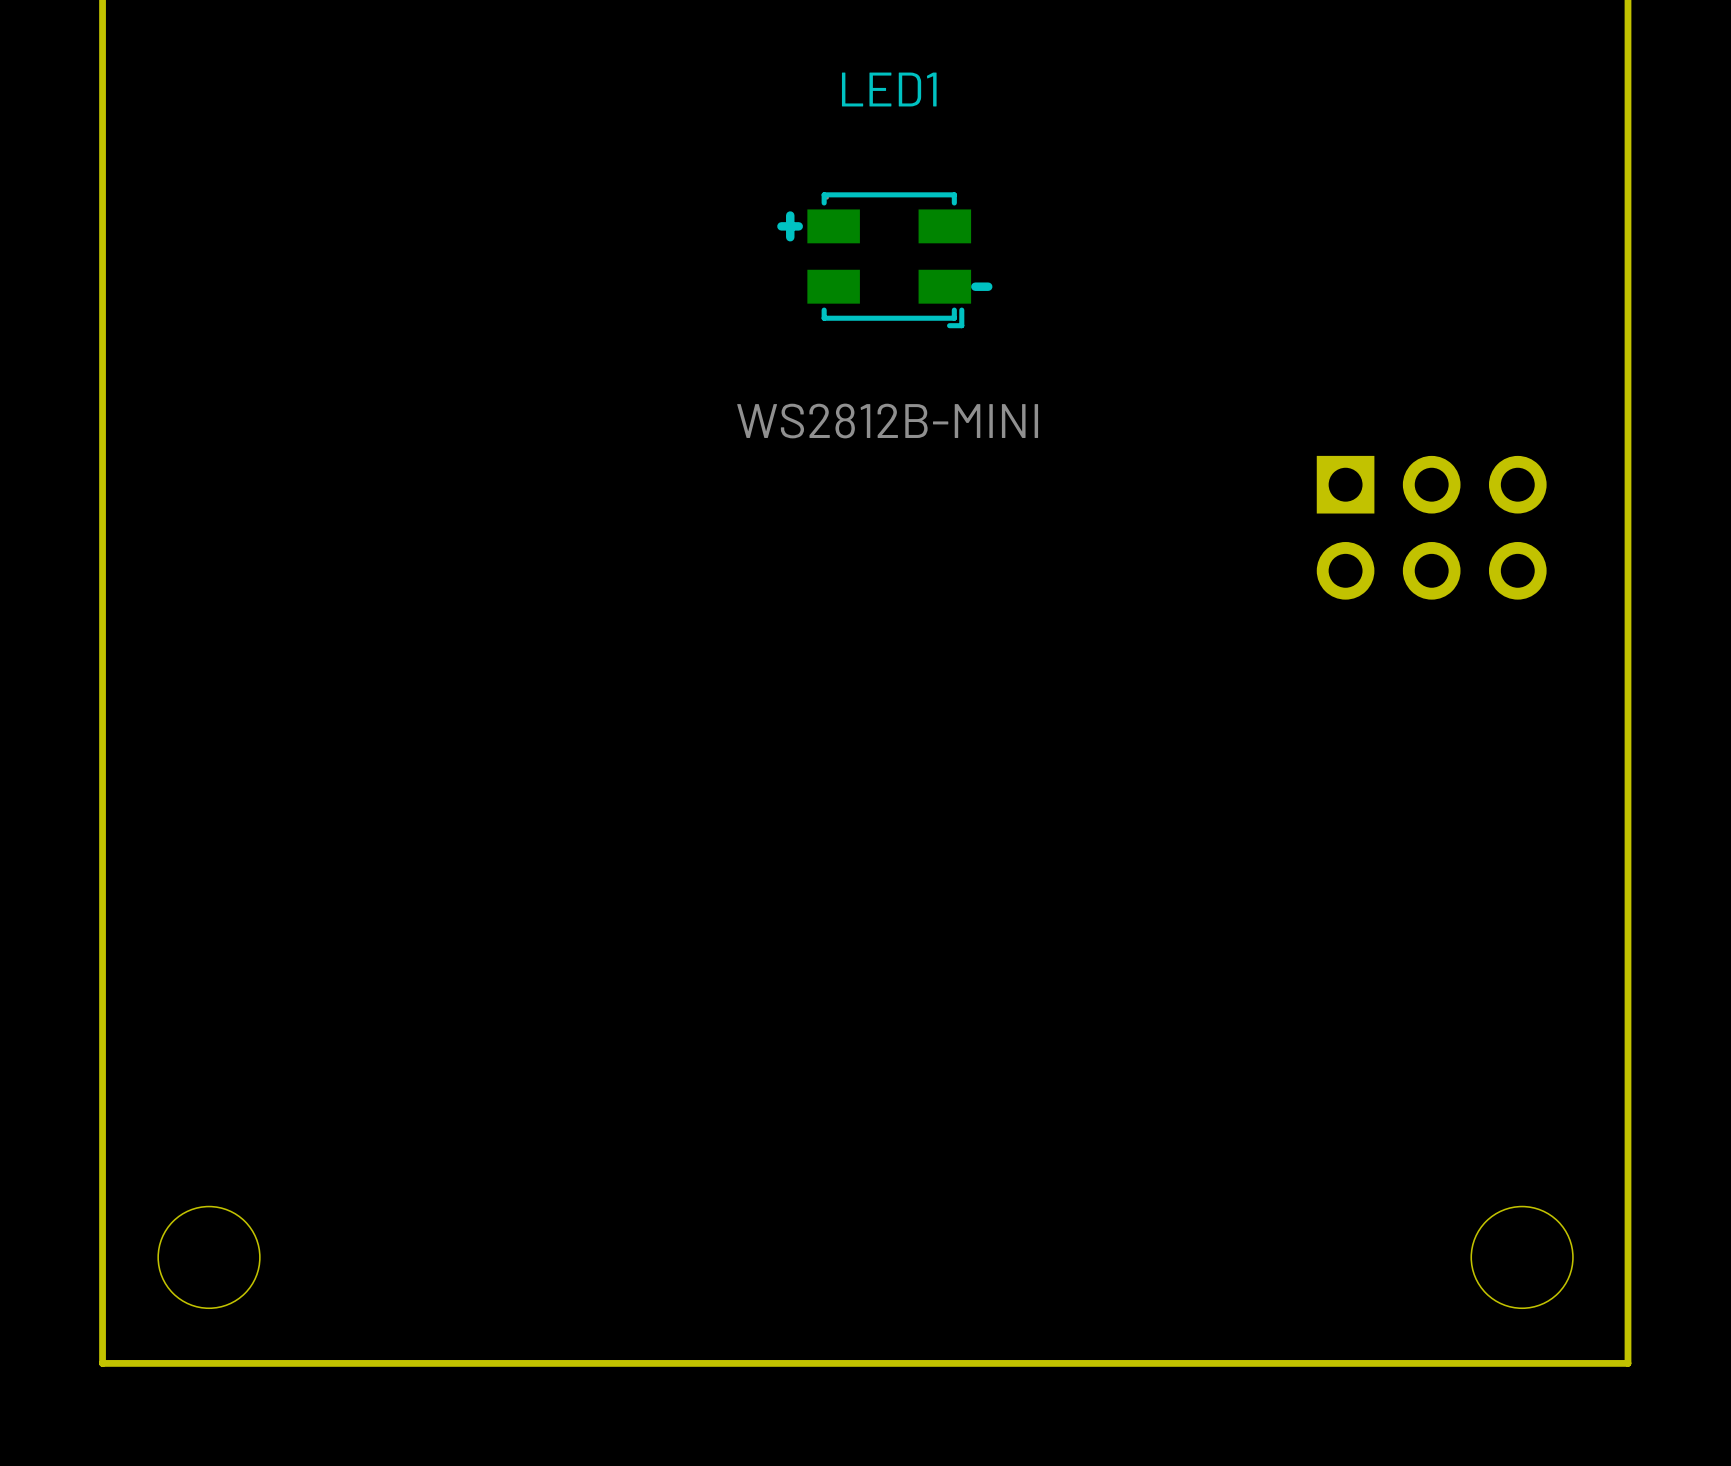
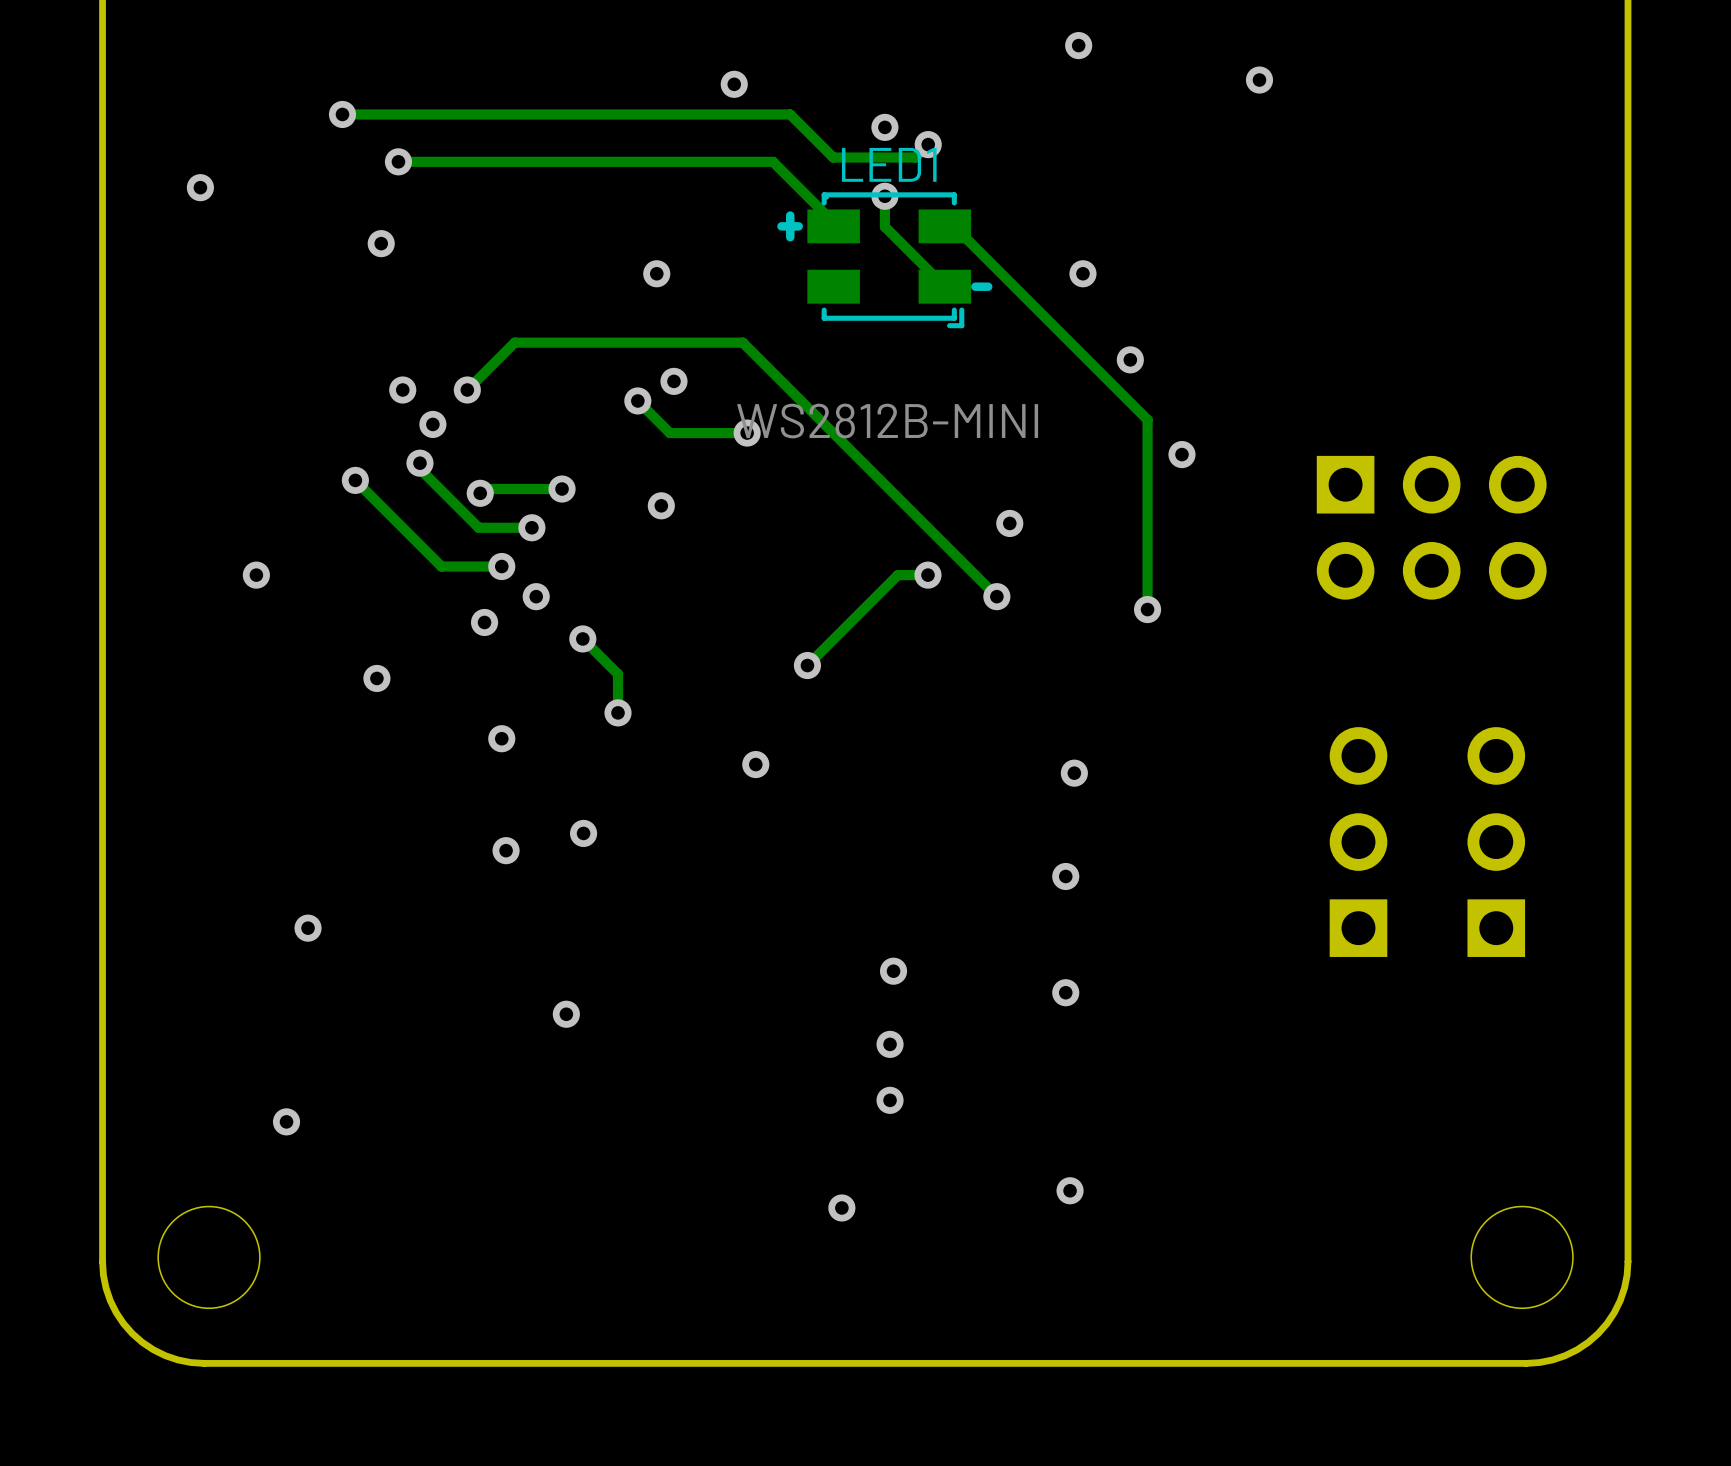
via: none -> (1078, 45)
via: none -> (1259, 80)
via: none -> (734, 84)
LED1 name position: LED1 (889, 89) -> LED1 (889, 164)
track: none -> (342, 114) (790, 114) (833, 157) (915, 157) (928, 144)
via: none -> (342, 114)
via: none -> (884, 127)
via: none -> (928, 144)
track: none -> (398, 161) (773, 161) (833, 222) (833, 226)
via: none -> (398, 161)
via: none -> (200, 187)
track: none -> (884, 196) (884, 226) (944, 286)
via: none -> (884, 196)
track: none -> (944, 226) (954, 226) (1147, 419) (1147, 609)
via: none -> (381, 243)
via: none -> (656, 273)
via: none -> (1082, 273)
via: none -> (1130, 359)
via: none -> (673, 381)
via: none -> (402, 390)
track: none -> (467, 390) (514, 342) (742, 342) (996, 596)
via: none -> (467, 390)
track: none -> (637, 400) (669, 433) (747, 433)
via: none -> (637, 400)
via: none -> (432, 424)
via: none -> (747, 433)
via: none -> (1181, 454)
track: none -> (419, 463) (419, 469) (478, 527) (531, 527)
via: none -> (419, 463)
track: none -> (355, 480) (441, 566) (501, 566)
via: none -> (355, 480)
track: none -> (562, 489) (484, 489) (480, 493)
via: none -> (562, 489)
via: none -> (480, 493)
via: none -> (661, 505)
via: none -> (1009, 523)
via: none -> (531, 527)
via: none -> (501, 566)
via: none -> (256, 575)
track: none -> (927, 575) (897, 575) (807, 665)
via: none -> (927, 575)
via: none -> (536, 596)
via: none -> (996, 596)
via: none -> (1147, 609)
via: none -> (484, 622)
track: none -> (582, 638) (618, 674) (618, 712)
via: none -> (582, 638)
via: none -> (807, 665)
via: none -> (376, 678)
via: none -> (618, 712)
via: none -> (501, 738)
via: none -> (755, 764)
via: none -> (1074, 773)
via: none -> (583, 833)
part: none -> (1358, 842)
part: none -> (1496, 842)
via: none -> (506, 850)
via: none -> (1065, 876)
via: none -> (308, 928)
via: none -> (893, 971)
via: none -> (1065, 992)
via: none -> (566, 1014)
via: none -> (890, 1044)
via: none -> (890, 1100)
via: none -> (286, 1121)
via: none -> (1070, 1190)
via: none -> (841, 1207)
board edge: (102, 1261) (102, 1363) (204, 1363) -> (102, 1261) (106, 1288) (110, 1300) (116, 1312) (132, 1333) (153, 1349) (165, 1355) (177, 1359) (204, 1363)
board edge: (1628, 1261) (1628, 1363) (1526, 1363) -> (1628, 1261) (1627, 1274) (1620, 1300) (1606, 1323) (1598, 1333) (1588, 1342) (1565, 1355) (1552, 1359) (1526, 1363)

